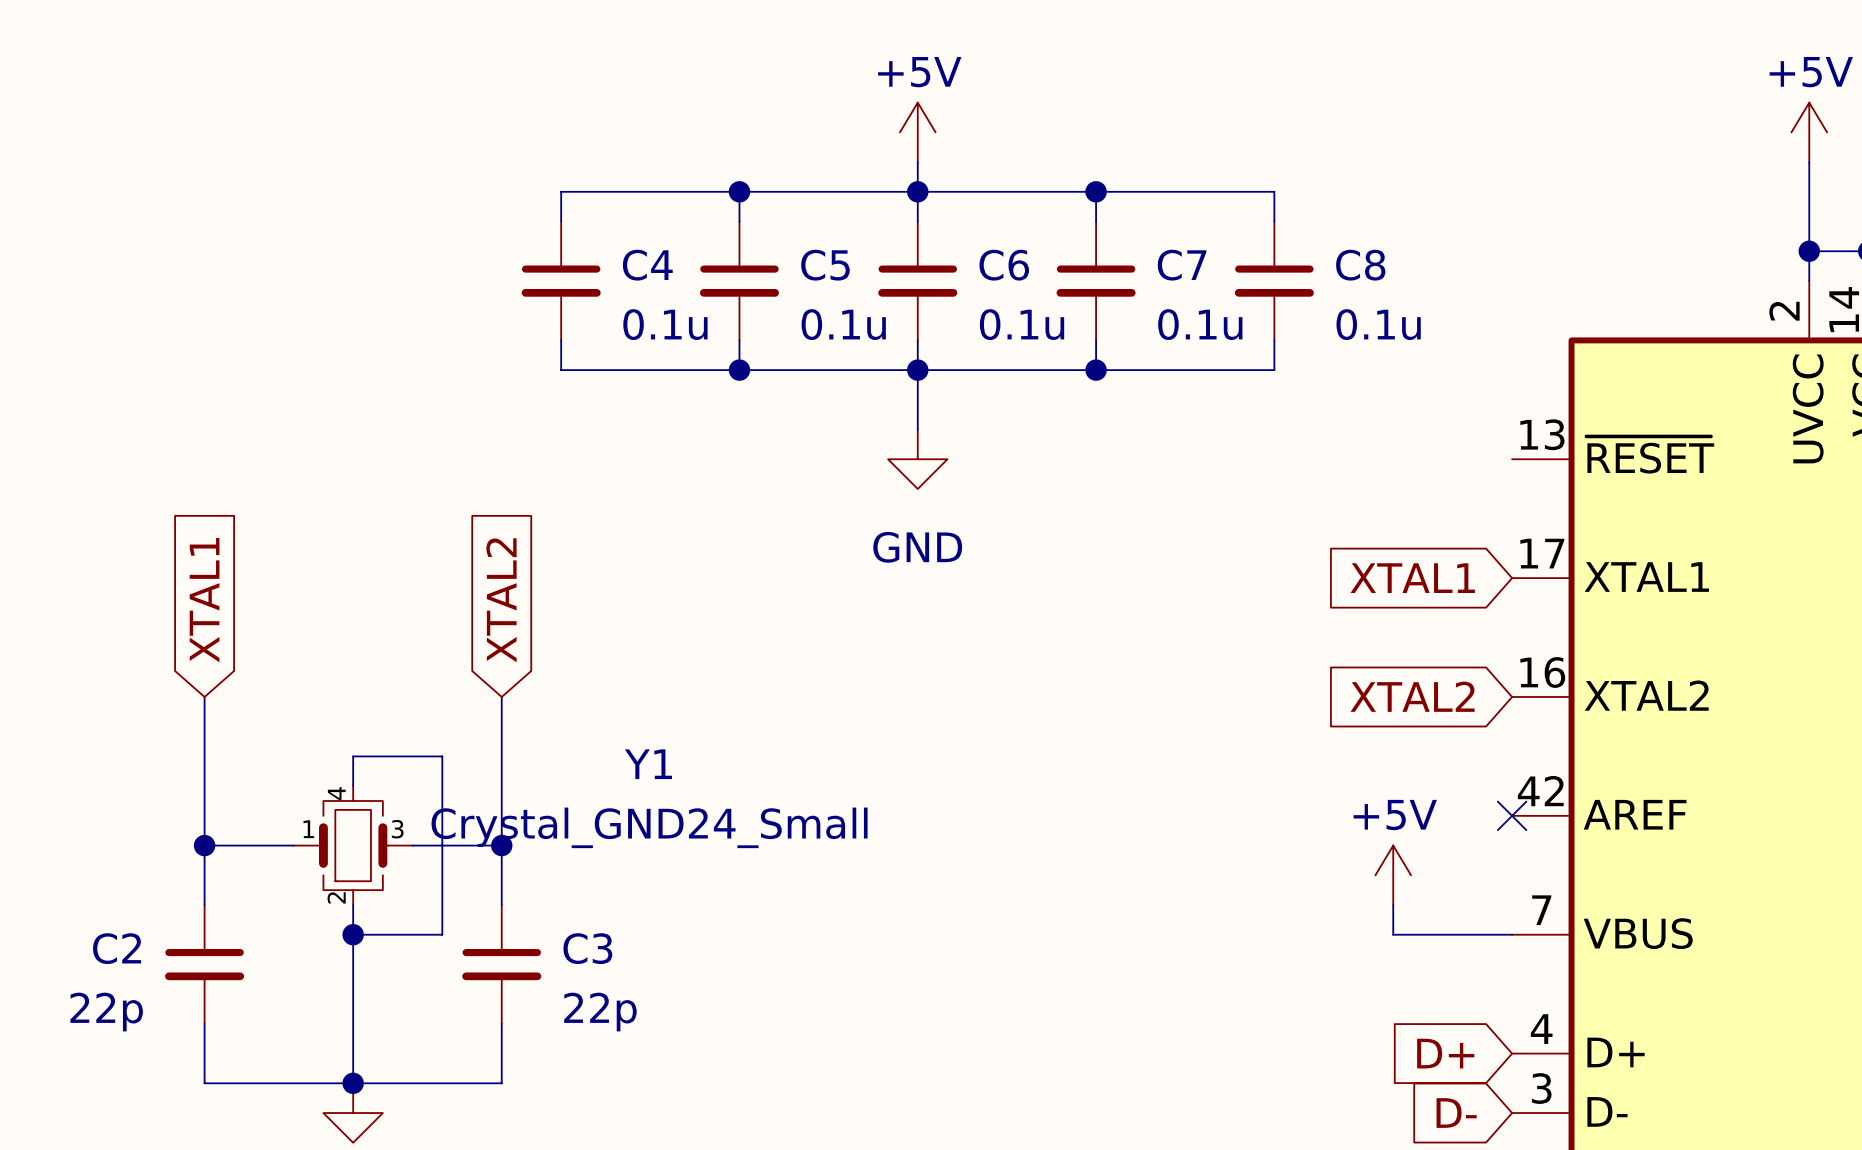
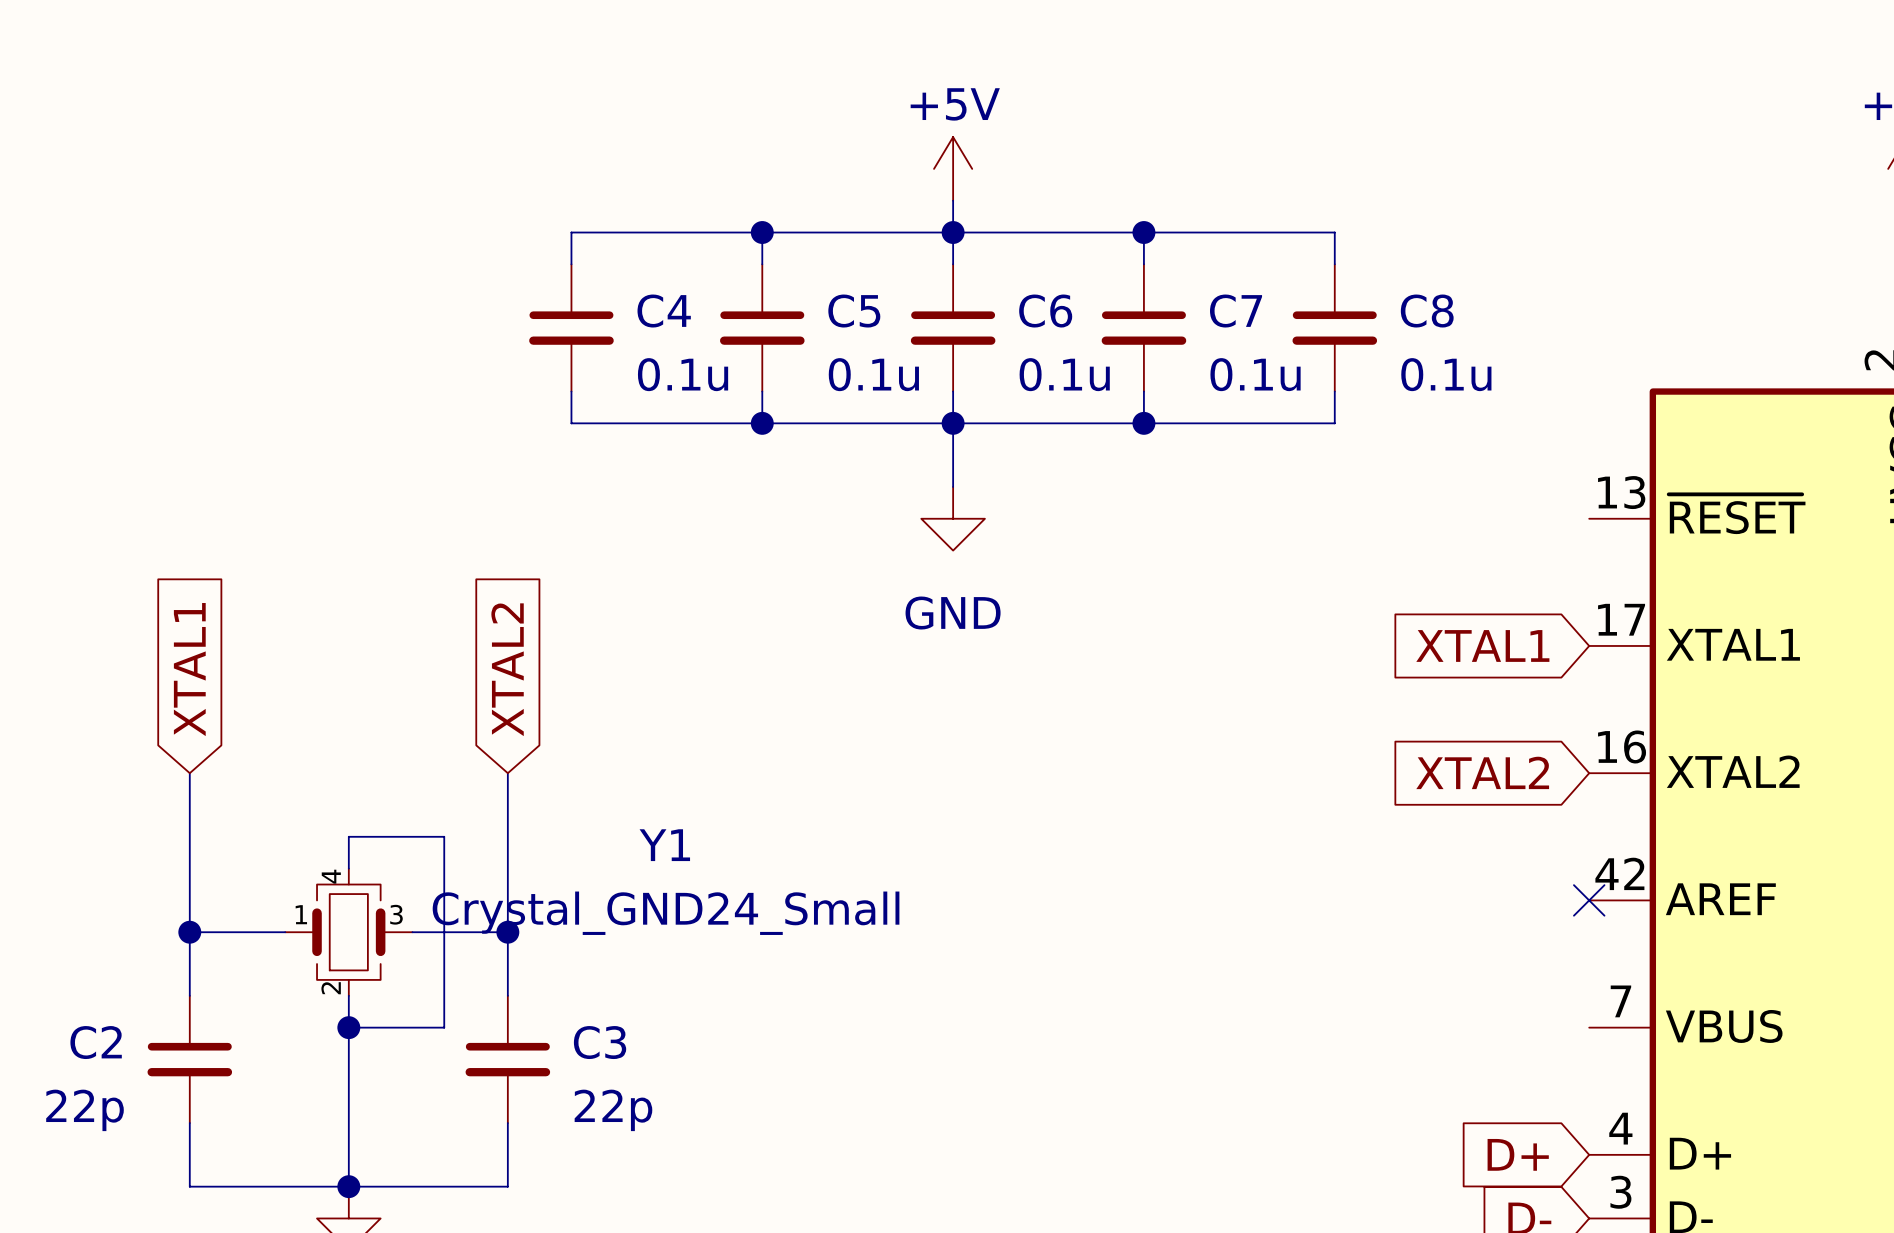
power symbol: +5V (1393, 875) -> none
wire: (1393, 905) (1393, 934) (1512, 934) -> none

